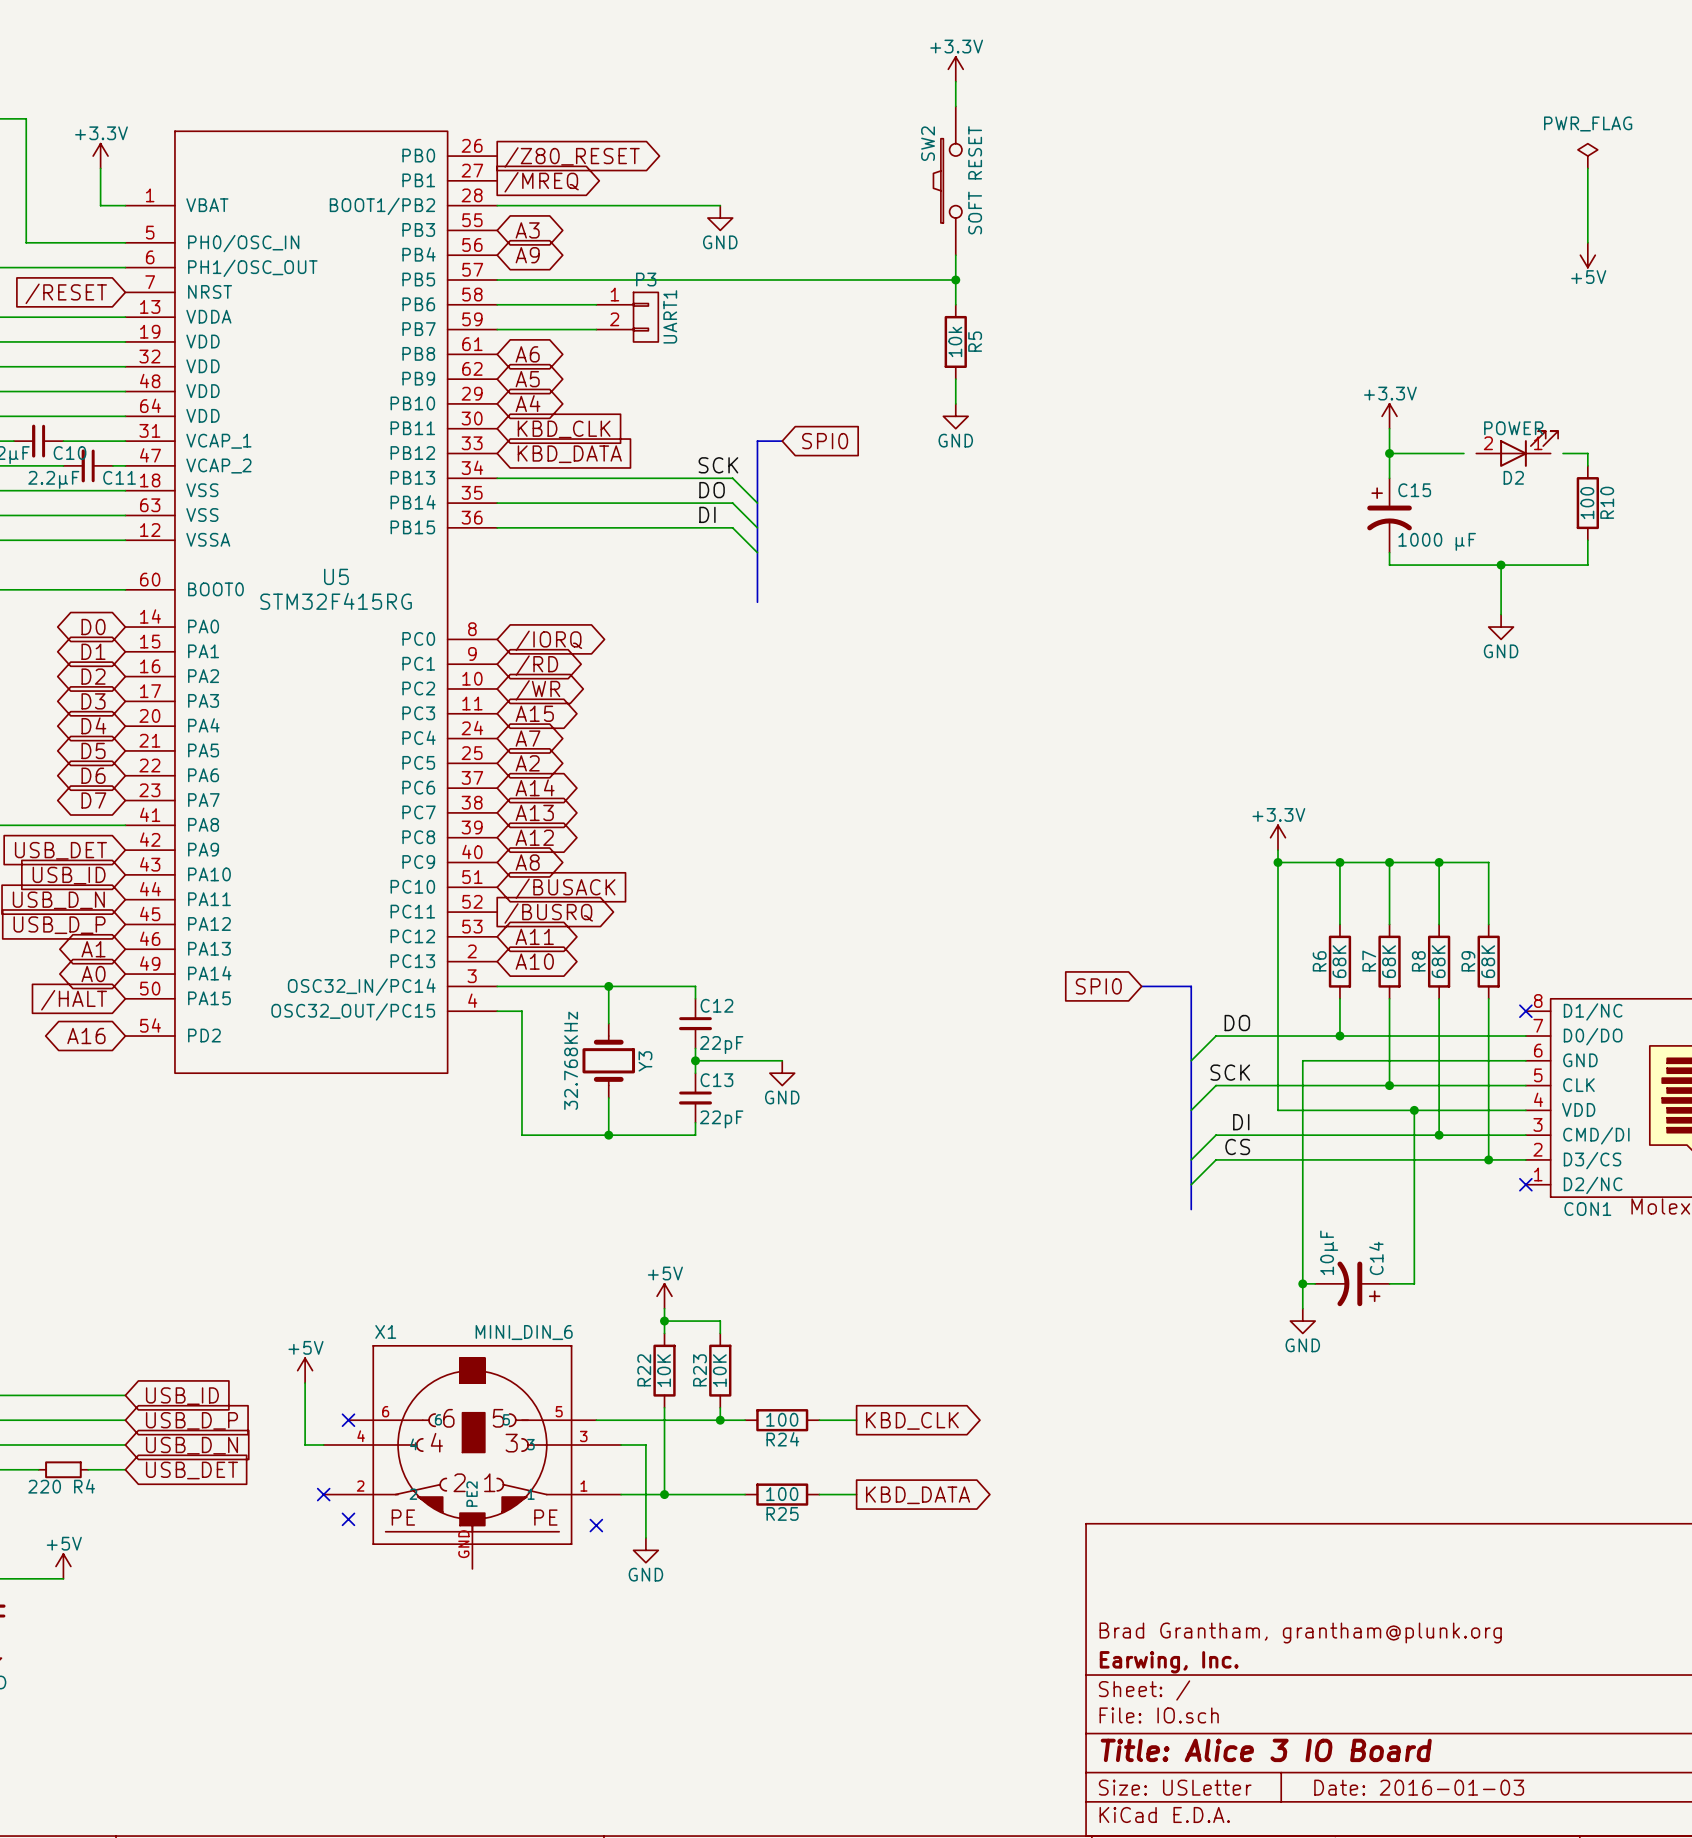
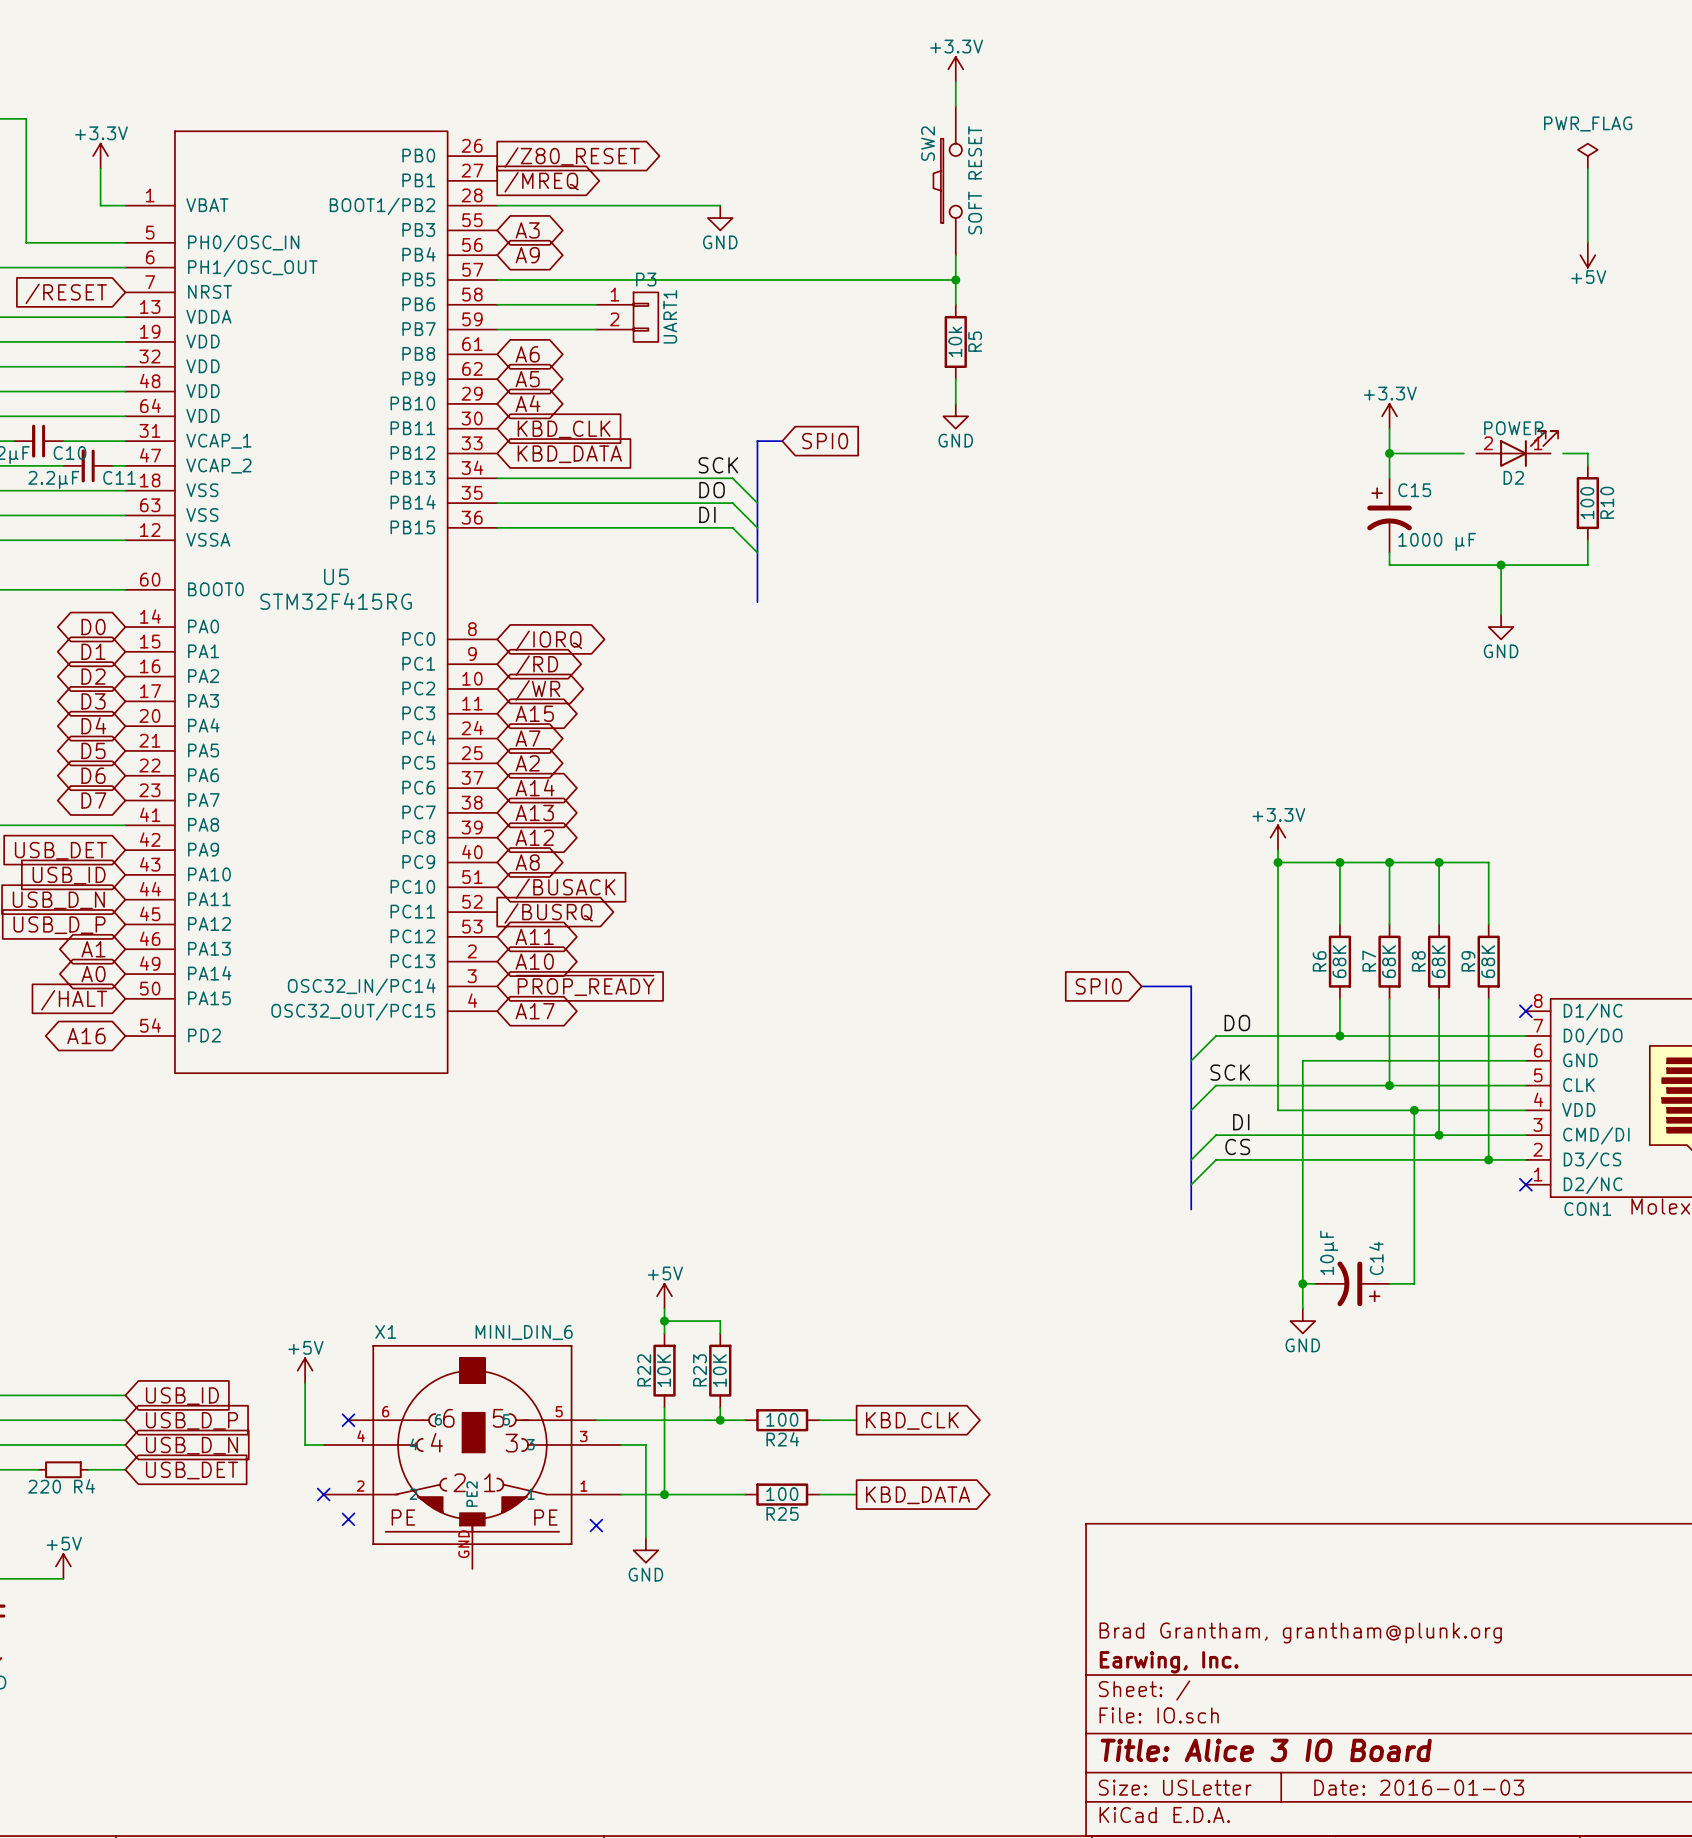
global label: none -> ~{PROP_READY} (585, 985)
wire: (497, 986) (695, 986) (695, 998) -> none
wire: (608, 986) (608, 1023) -> none
junction: (608, 986) -> none
wire: (497, 1011) (521, 1011) (521, 1135) (695, 1135) (695, 1122) -> none
global label: none -> A17 (535, 1011)
C12: 22pF (695, 1023) -> none
wire: (695, 1048) (695, 1073) -> none
Y3: 32.768KHz (608, 1060) -> none
wire: (695, 1060) (782, 1060) -> none
junction: (695, 1060) -> none
power symbol: GND (782, 1073) -> none
wire: (608, 1097) (608, 1135) -> none
C13: 22pF (695, 1097) -> none
junction: (608, 1135) -> none

